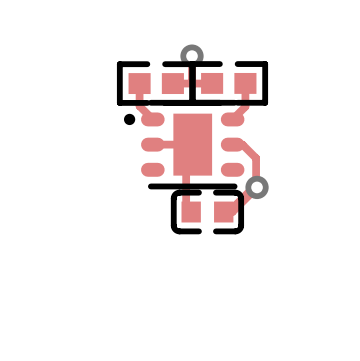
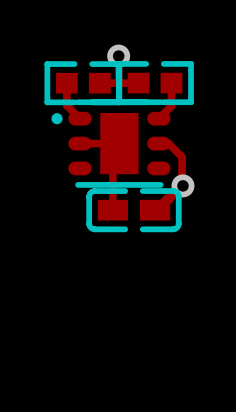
part footprint: [170, 189, 245, 235] -> [86, 188, 182, 233]

